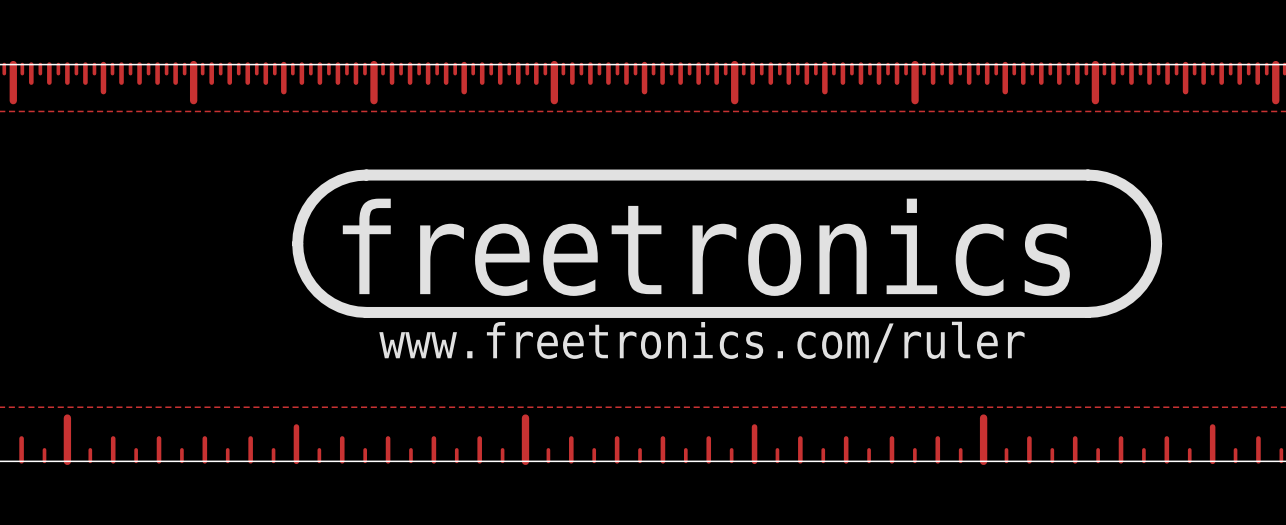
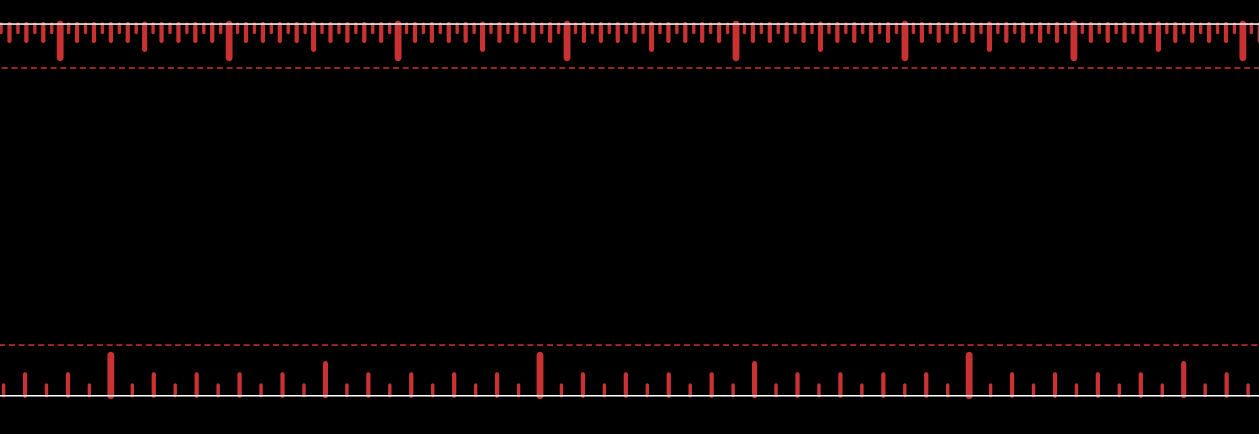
line: (1087, 175) (357, 175) (332, 184) (311, 201) (300, 225) (298, 252) (306, 278) (317, 292) (332, 303) (357, 311) (1096, 311) (1122, 303) (1136, 292) (1151, 270) (1156, 243) (1151, 217) (1136, 195) (1114, 180) (1087, 175) -> none
text: freetronics (706, 247) -> none
text: www.freetronics.com/ruler (701, 342) -> none

